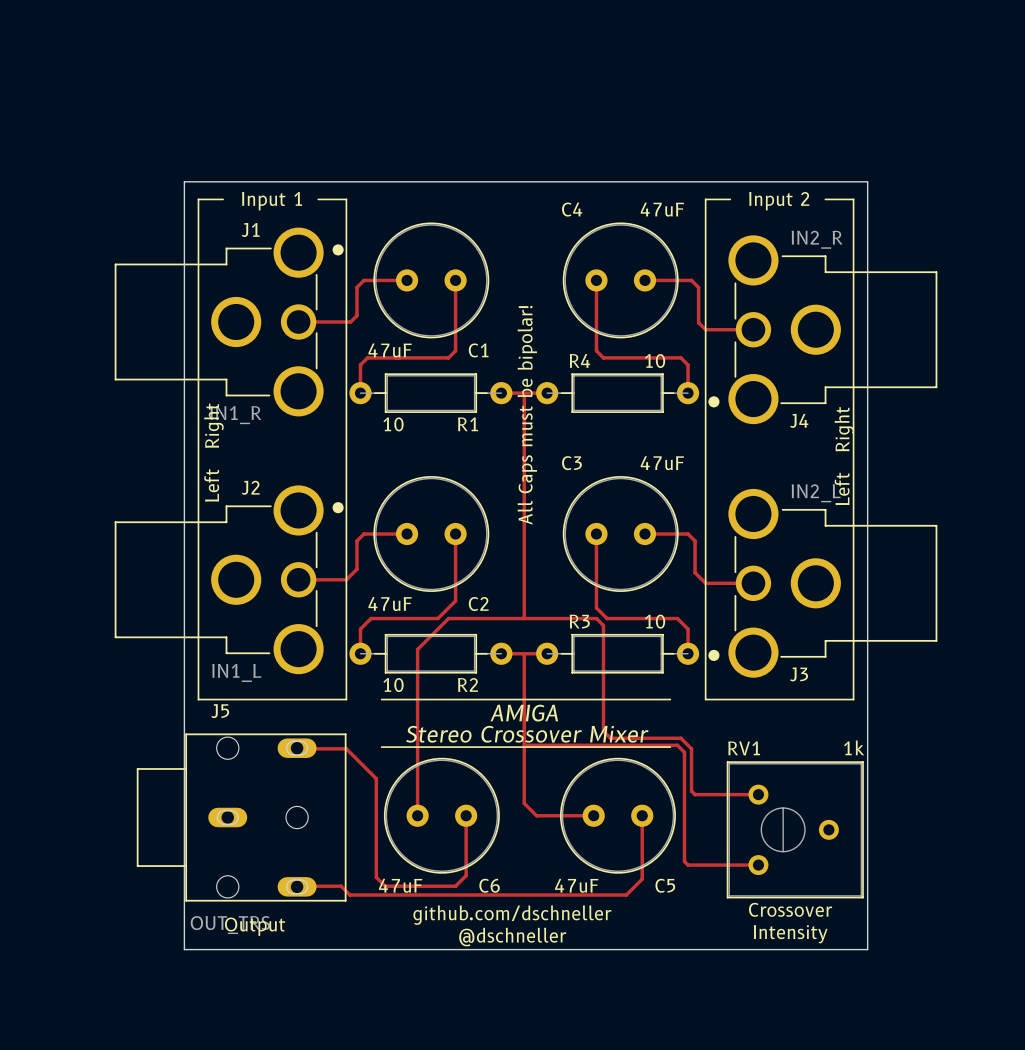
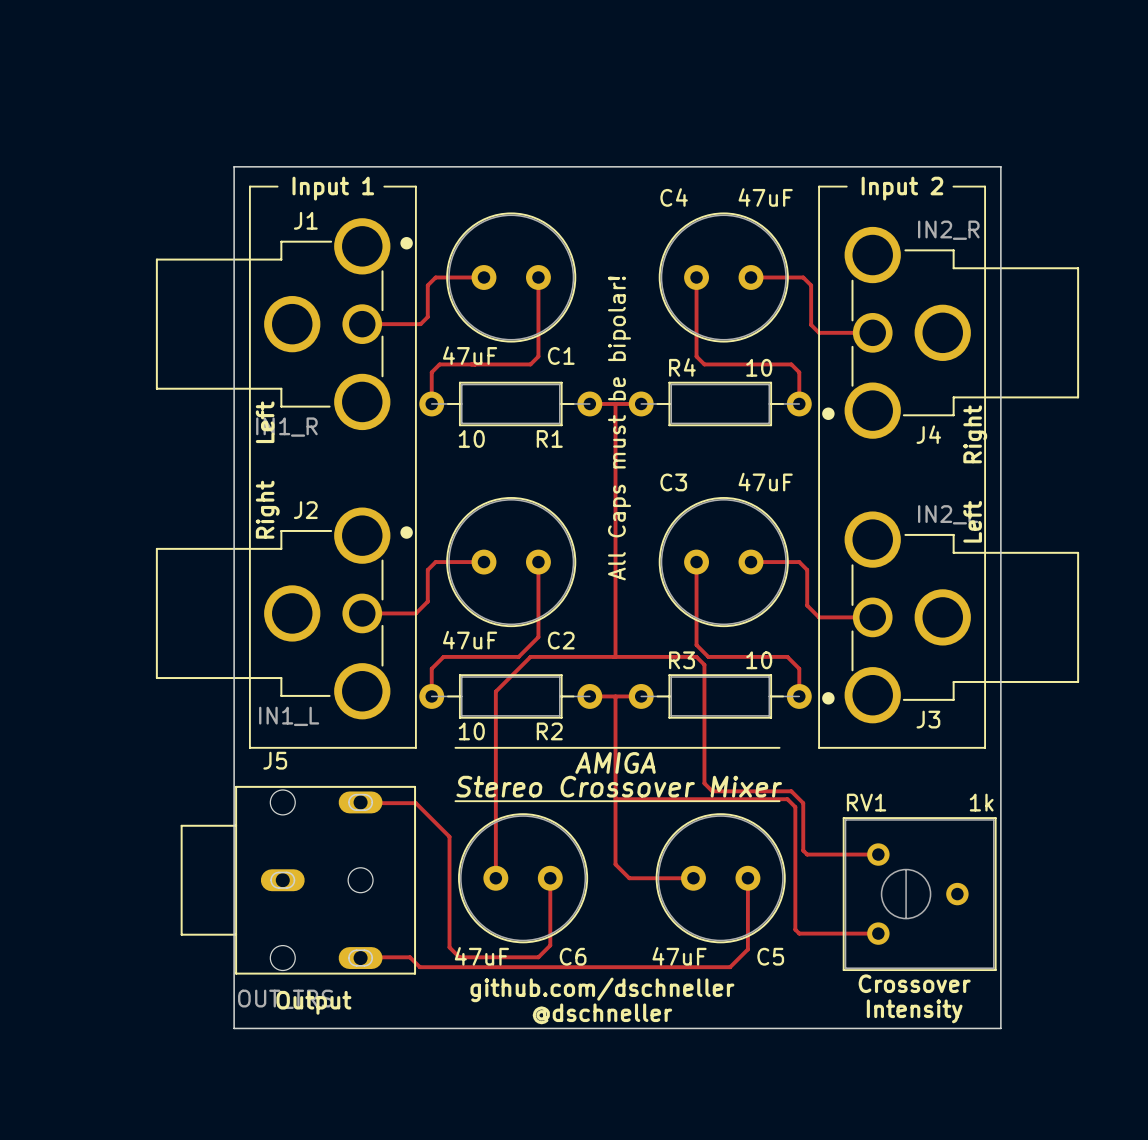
text: Left Right (213, 452) -> Right Left (267, 470)

